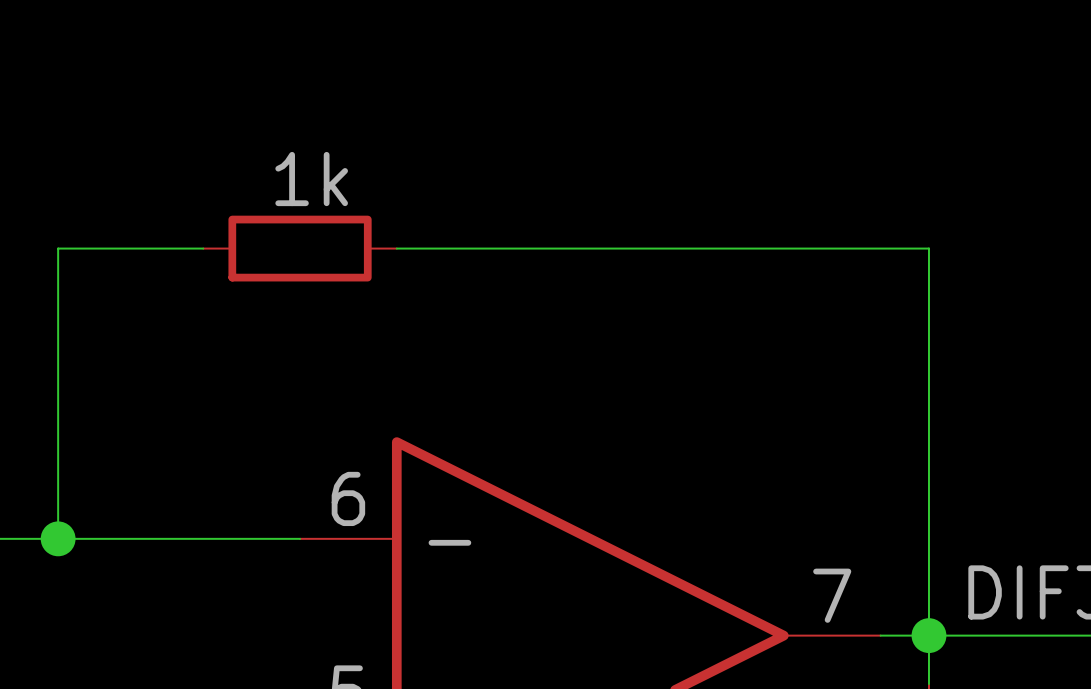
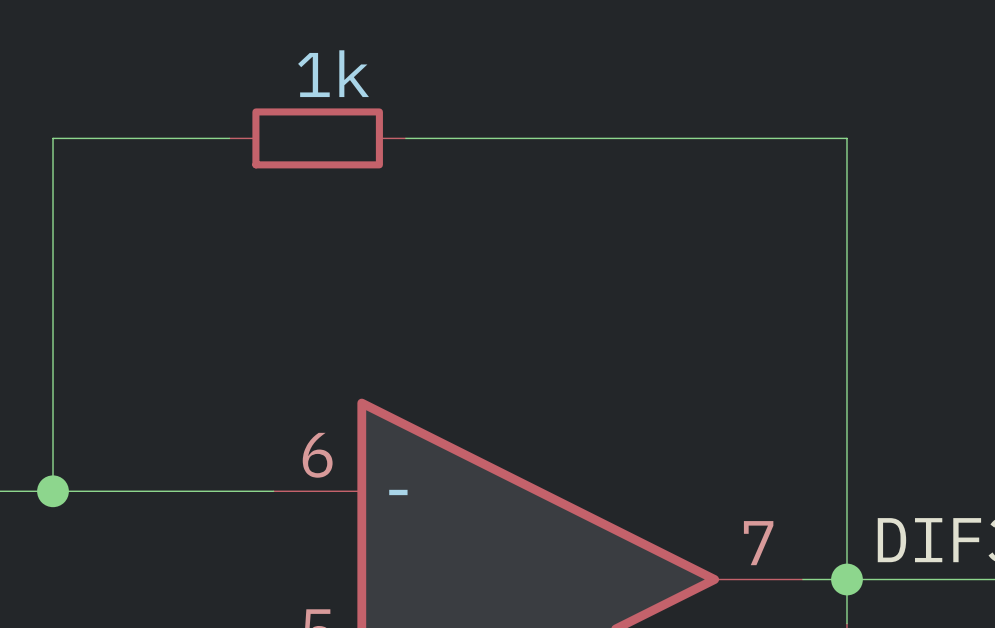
wire: (58, 248) (203, 248) -> (53, 226) (53, 138) (229, 138)
part position: (300, 248) -> (317, 138)
wire: (396, 248) (928, 248) -> (405, 138) (846, 138) (846, 226)

